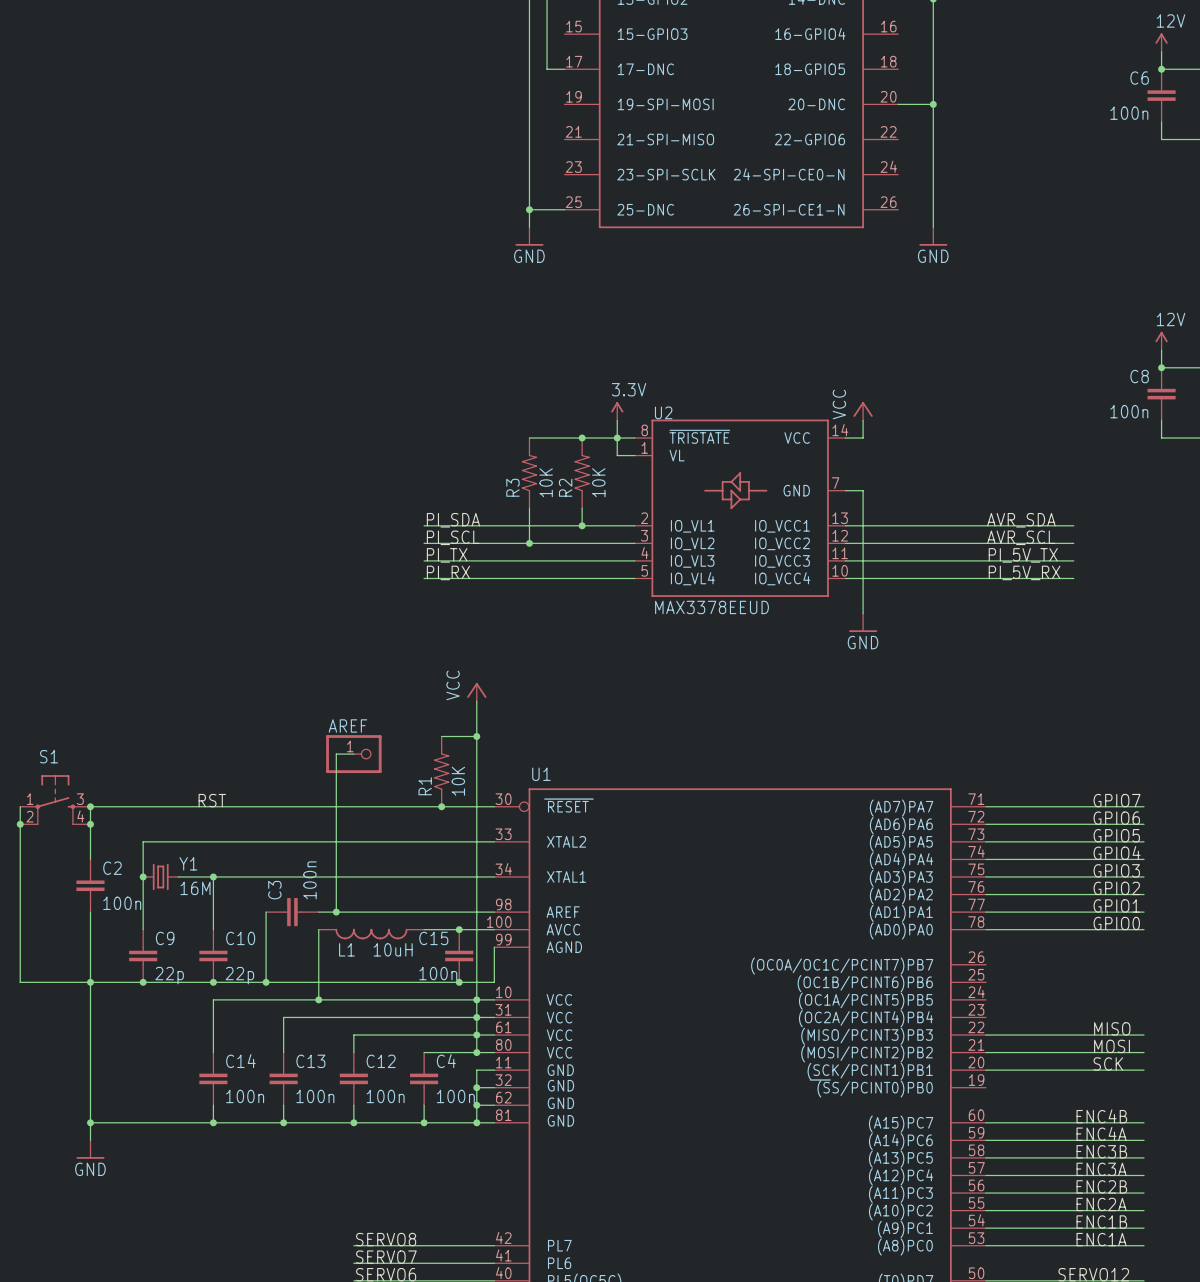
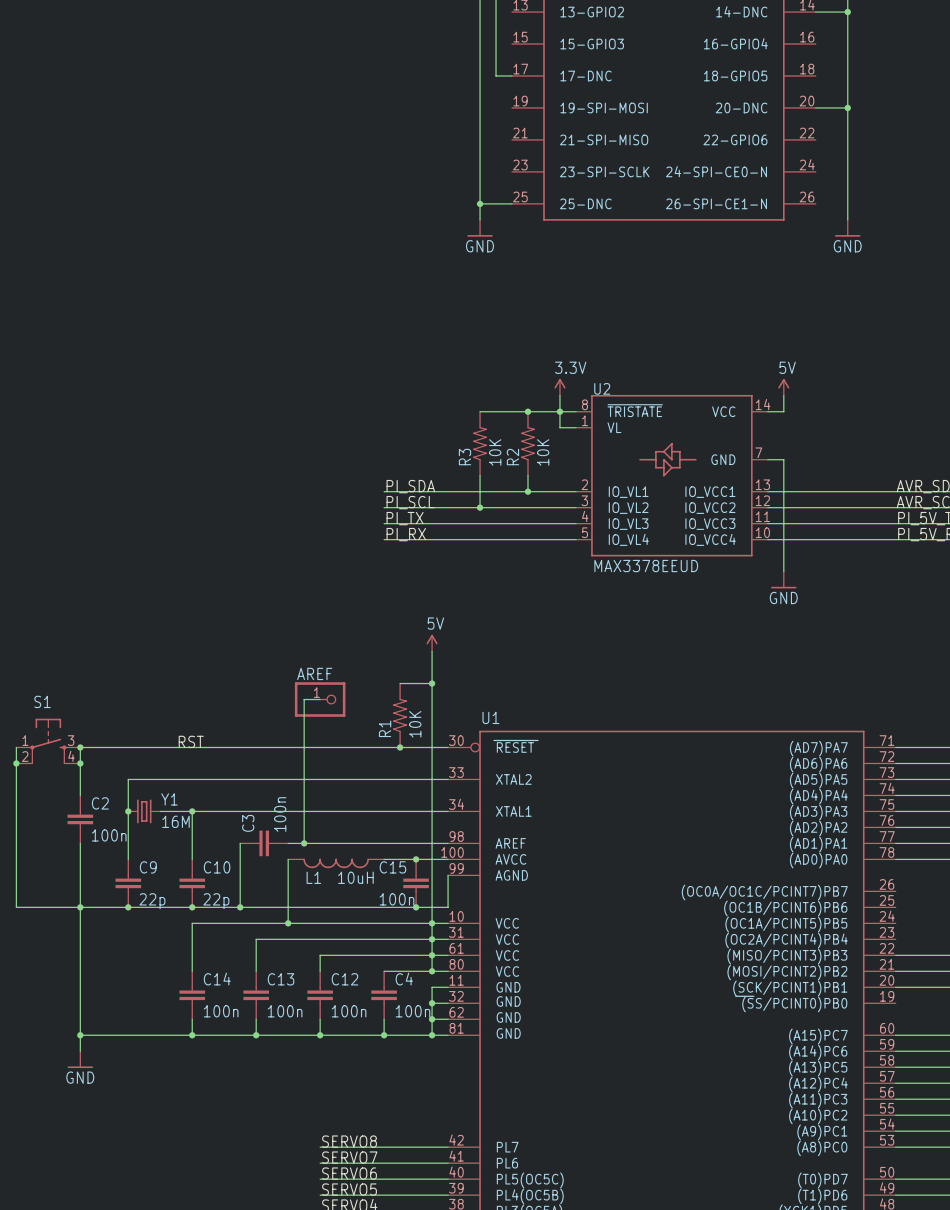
power symbol: VCC (863, 411) -> 5V (783, 387)
power symbol: VCC (476, 692) -> 5V (432, 643)

